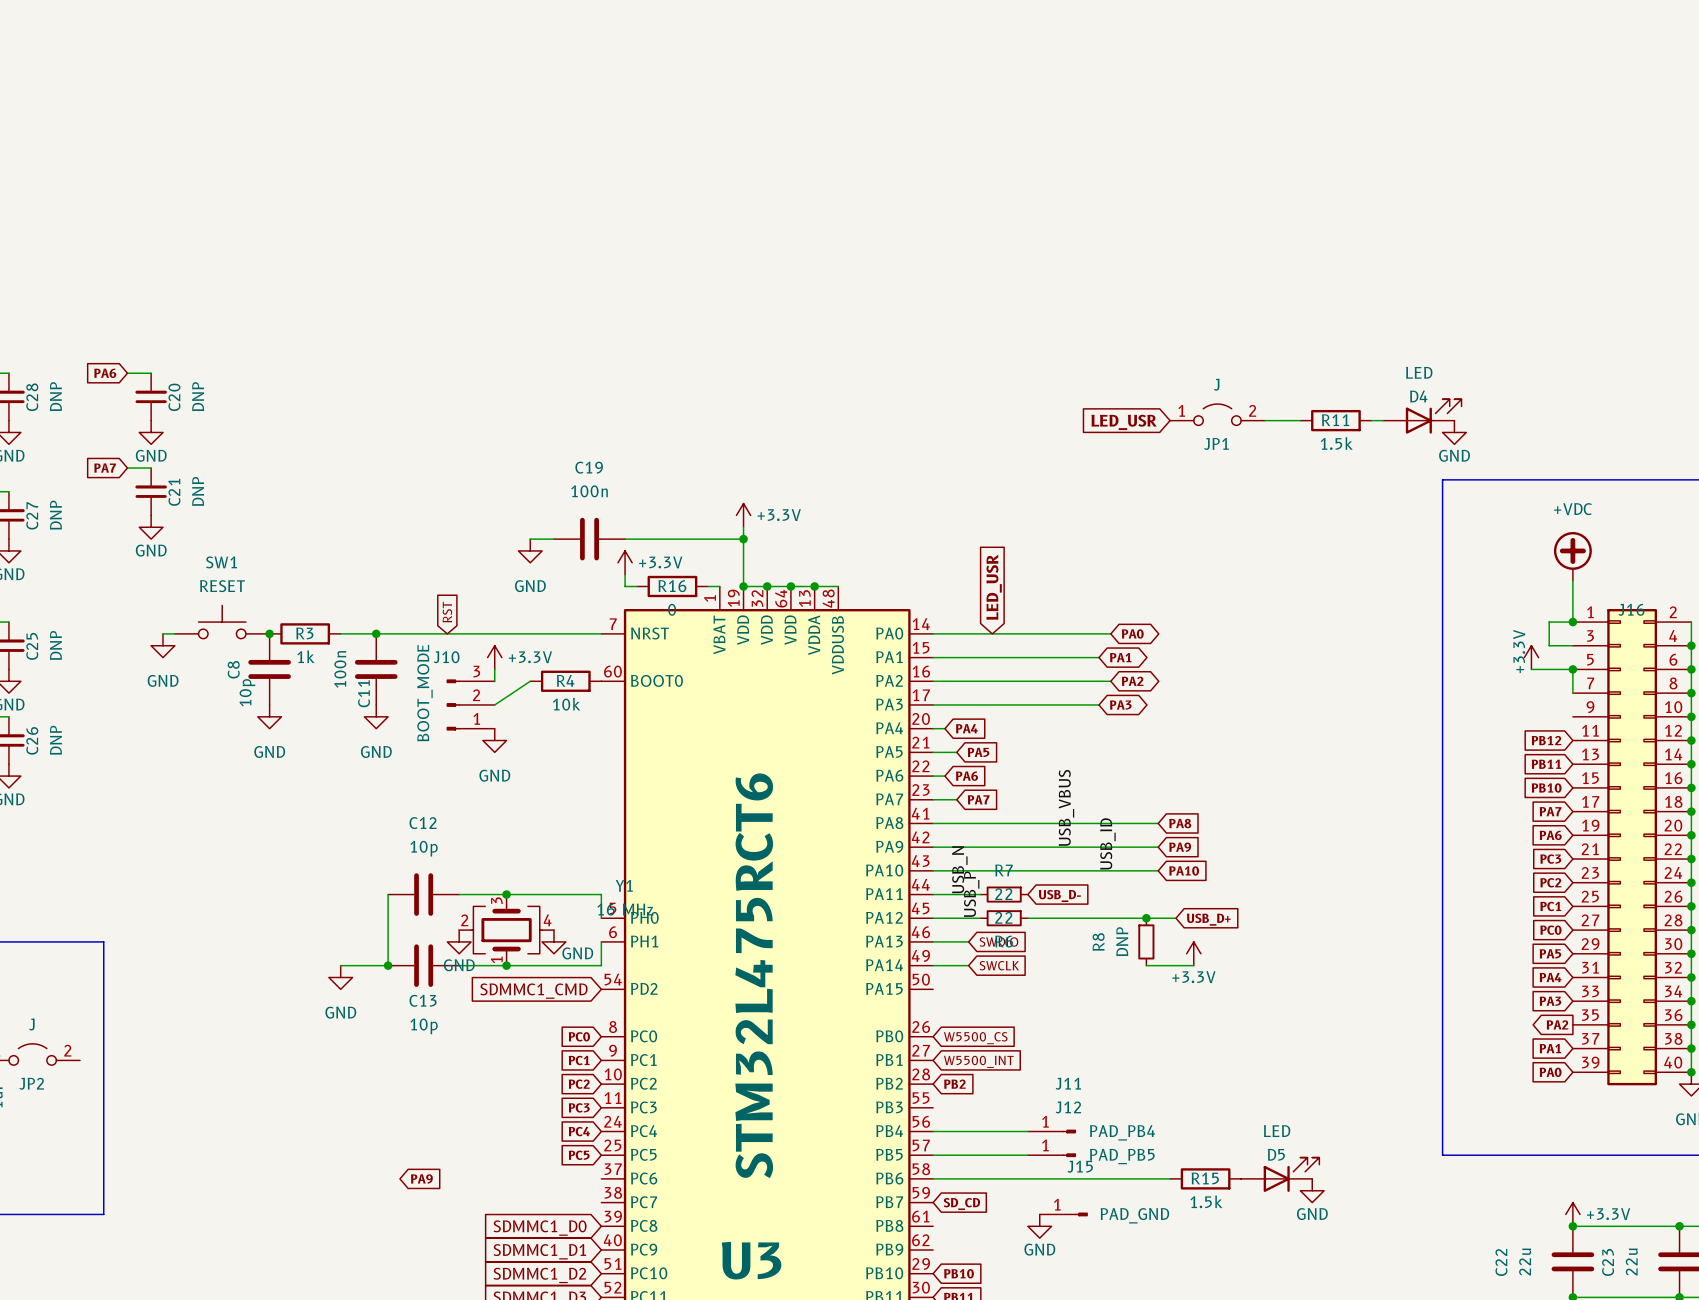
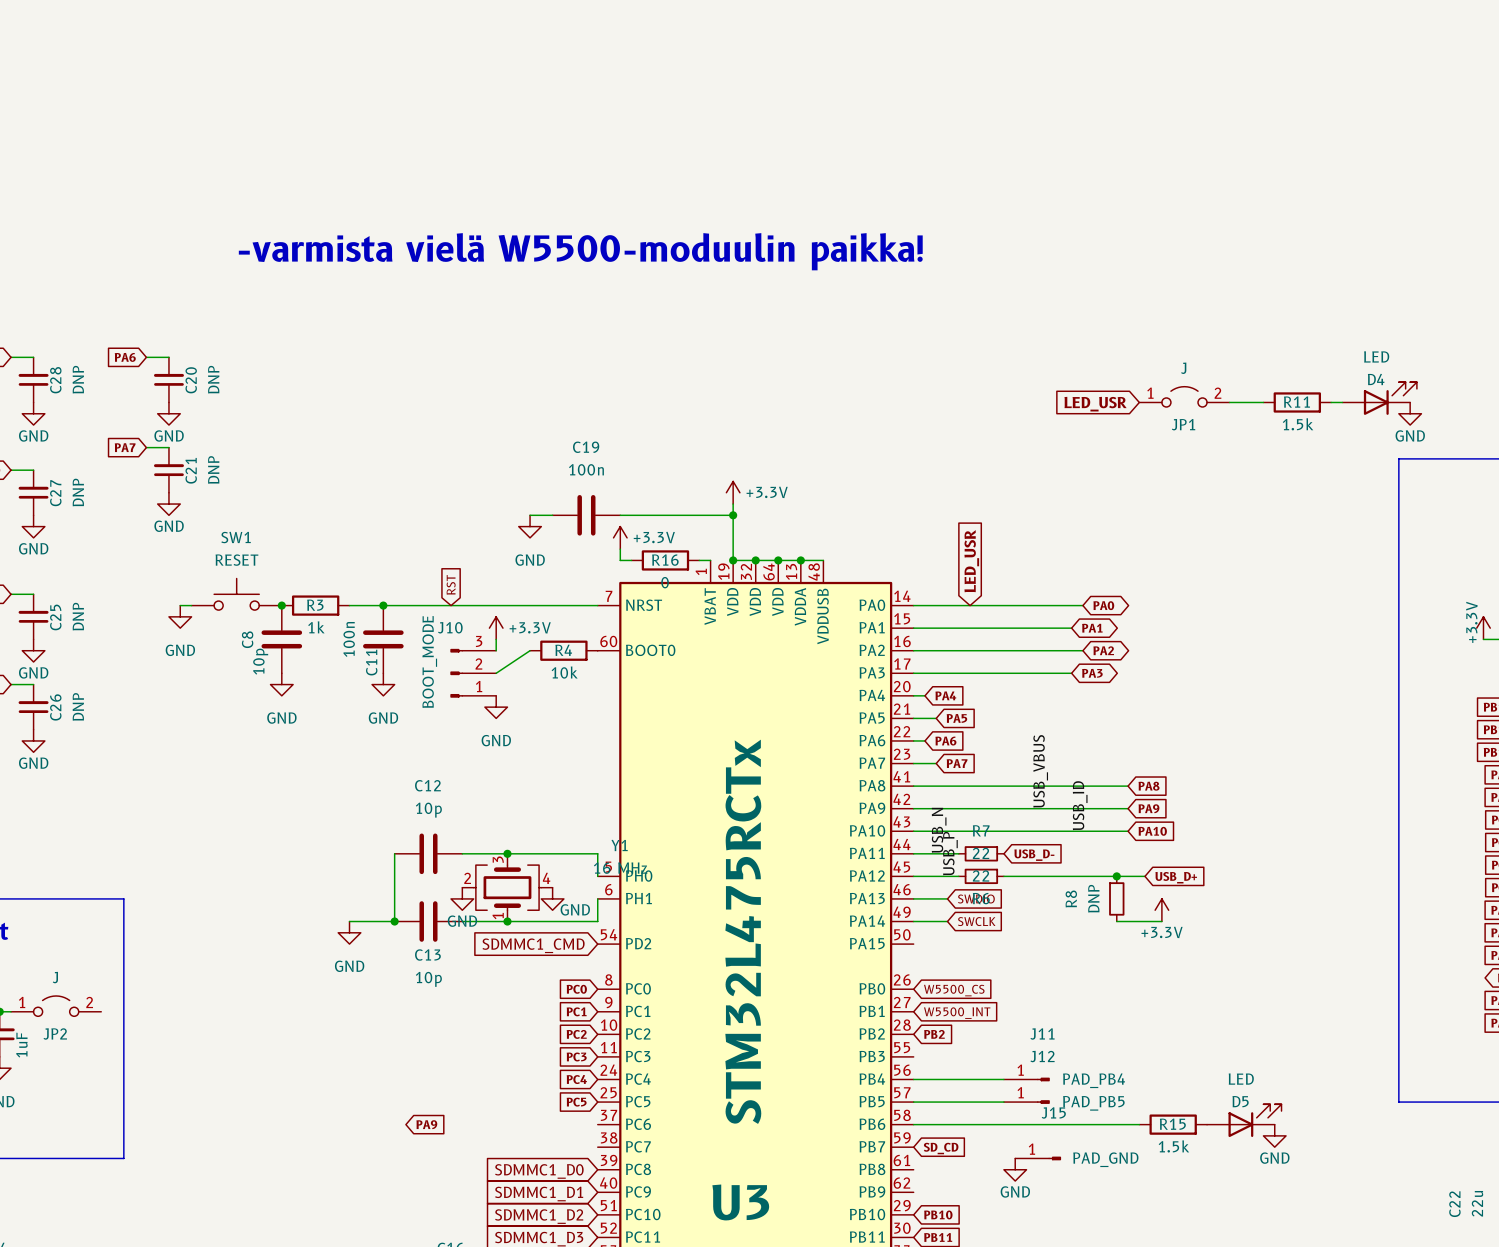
text: none -> -varmista vielä W5500-moduulin paikka! (580, 251)
U3 value: STM32L475RCT6 (754, 975) -> STM32L475RCTx (743, 931)

